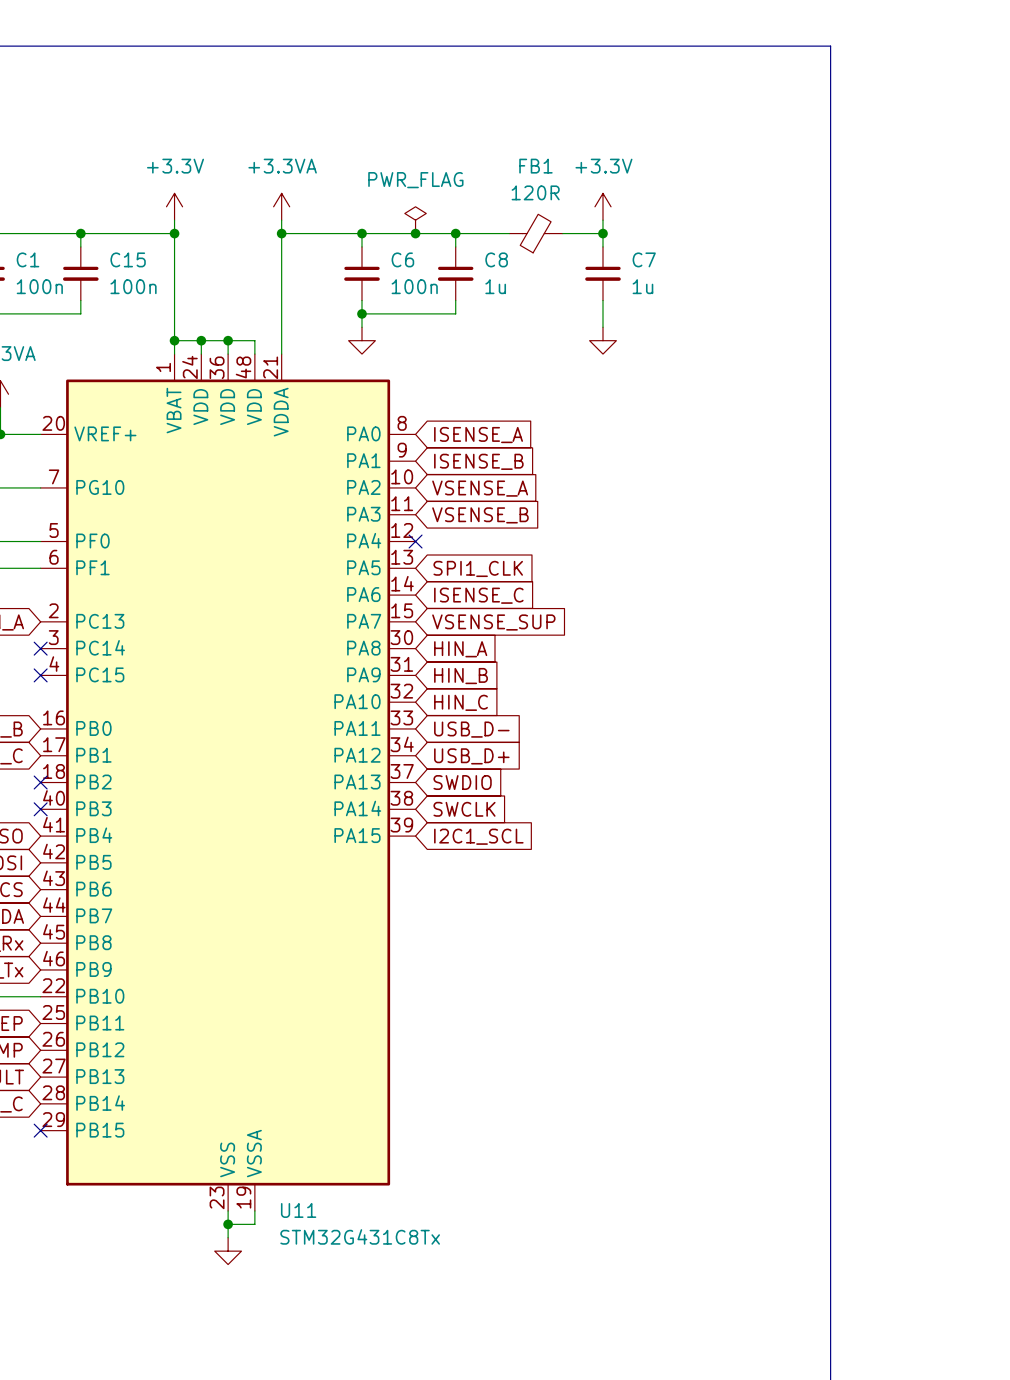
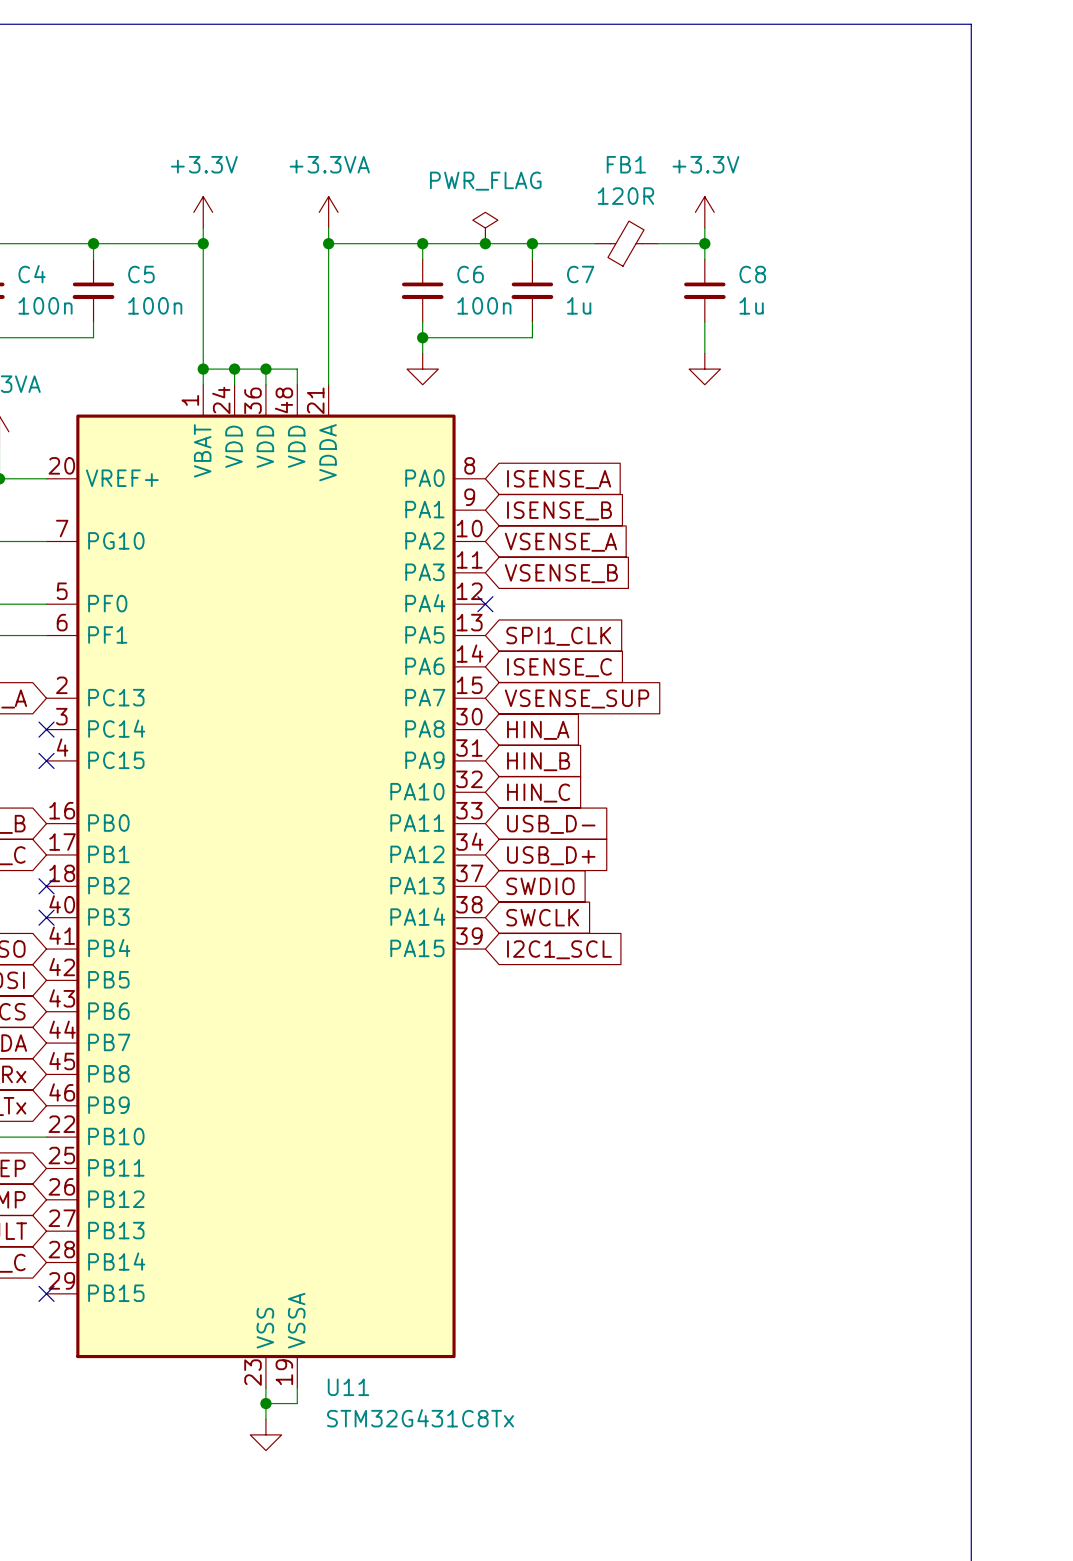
C1 name: C1 (28, 259) -> C4 (32, 274)
C15 name: C15 (128, 259) -> C5 (141, 274)
C8 name: C8 (496, 259) -> C7 (580, 274)
C7 name: C7 (644, 259) -> C8 (752, 274)

